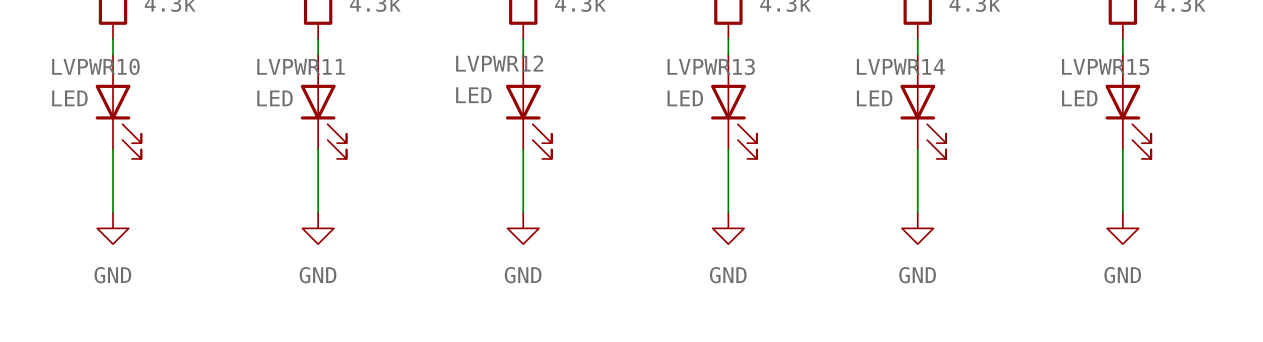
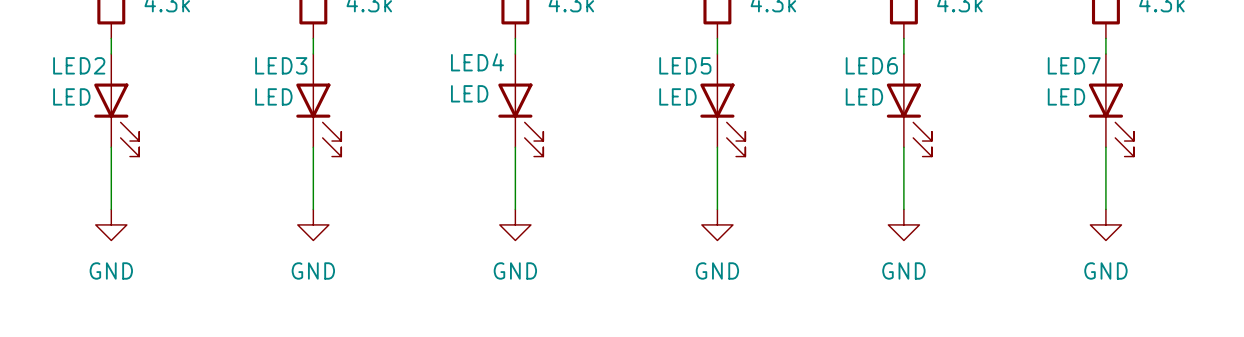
LVPWR12 name: LVPWR12 (499, 63) -> LED4 (477, 62)
LVPWR10 name: LVPWR10 (95, 66) -> LED2 (79, 65)
LVPWR11 name: LVPWR11 (301, 66) -> LED3 (281, 65)
LVPWR13 name: LVPWR13 (711, 66) -> LED5 (685, 65)
LVPWR14 name: LVPWR14 (900, 66) -> LED6 (871, 65)
LVPWR15 name: LVPWR15 (1105, 67) -> LED7 (1074, 65)

